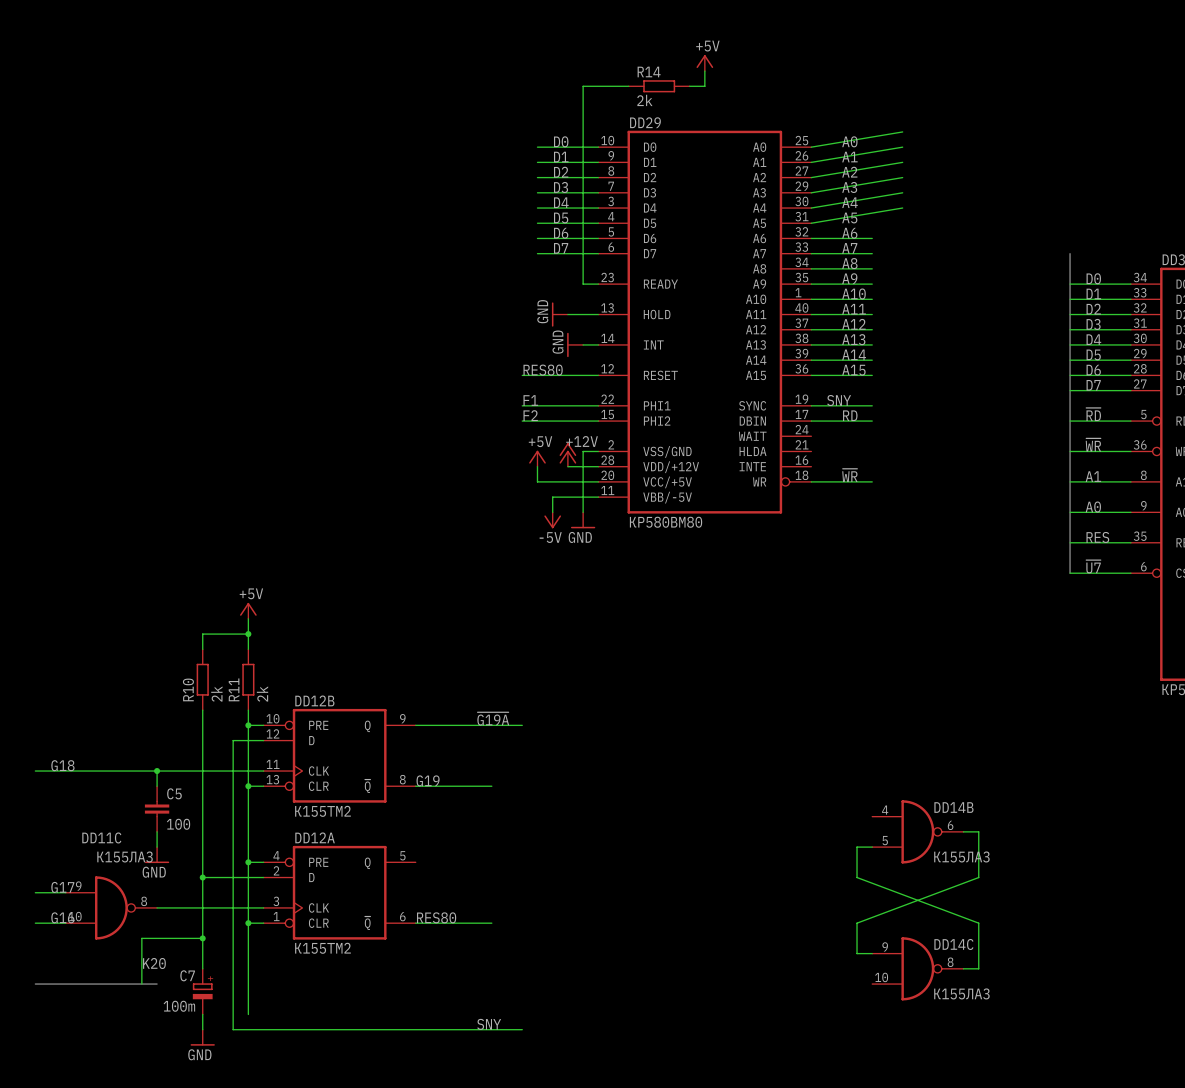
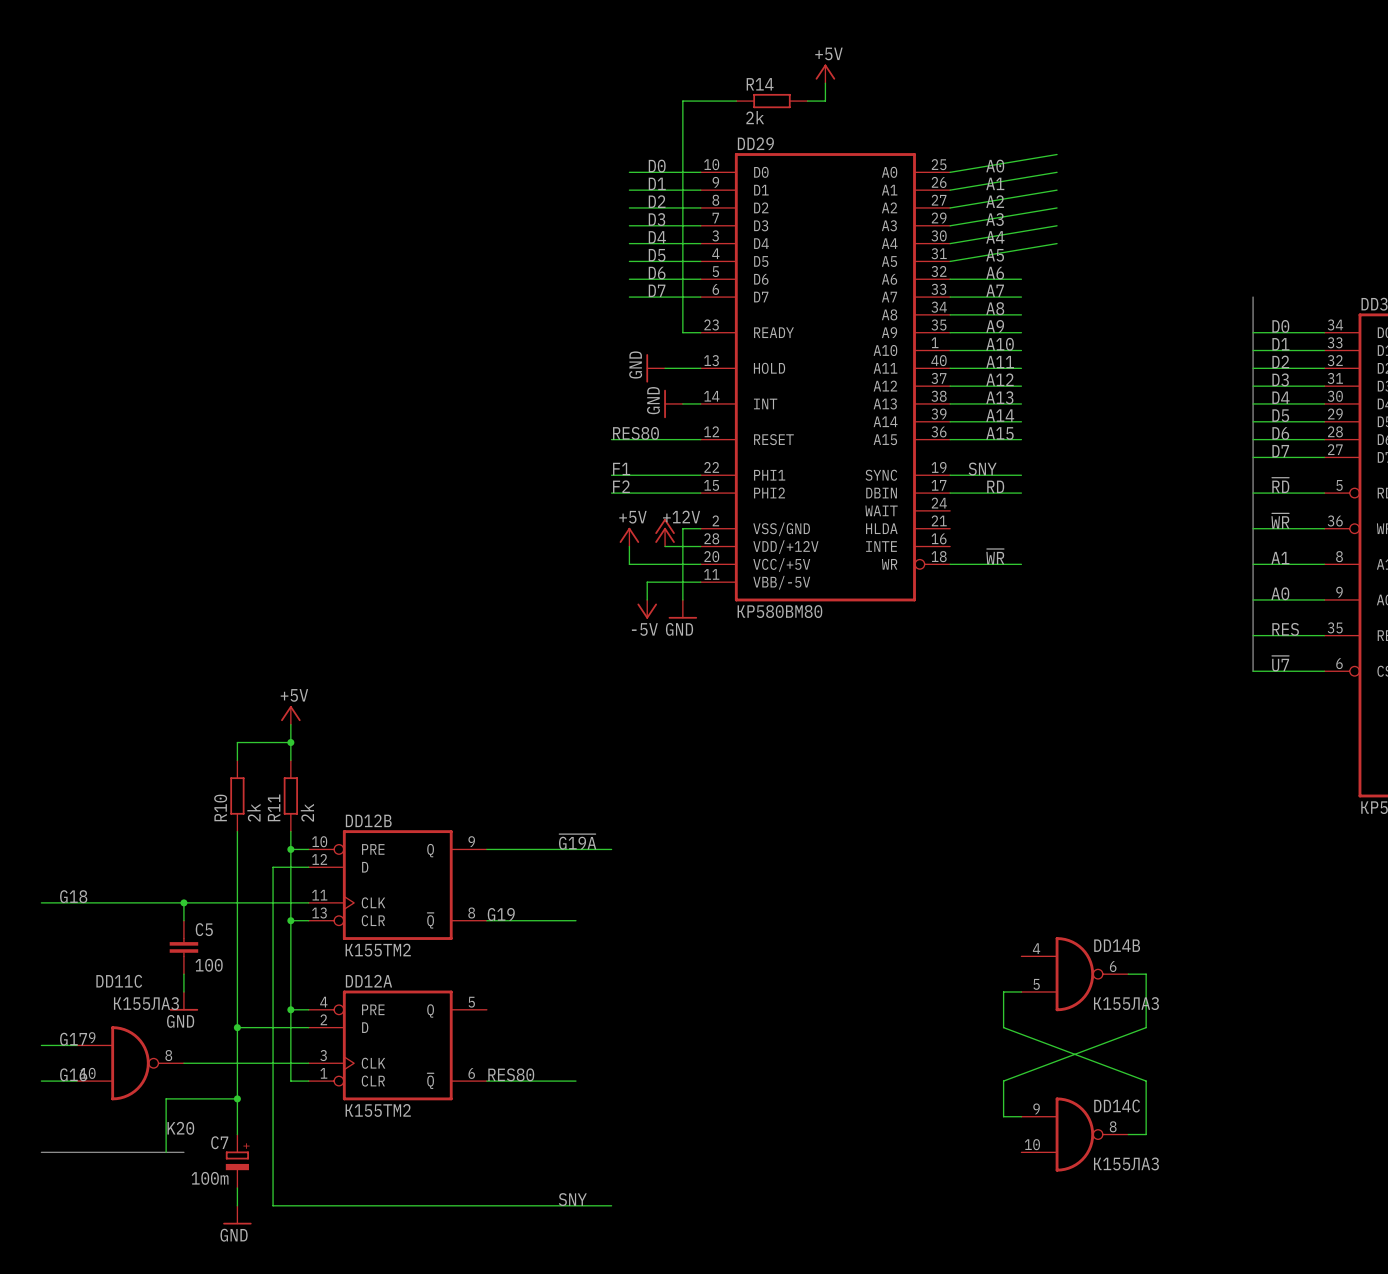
wire: (248, 923) (248, 1014) -> none
junction: (248, 923) -> none

